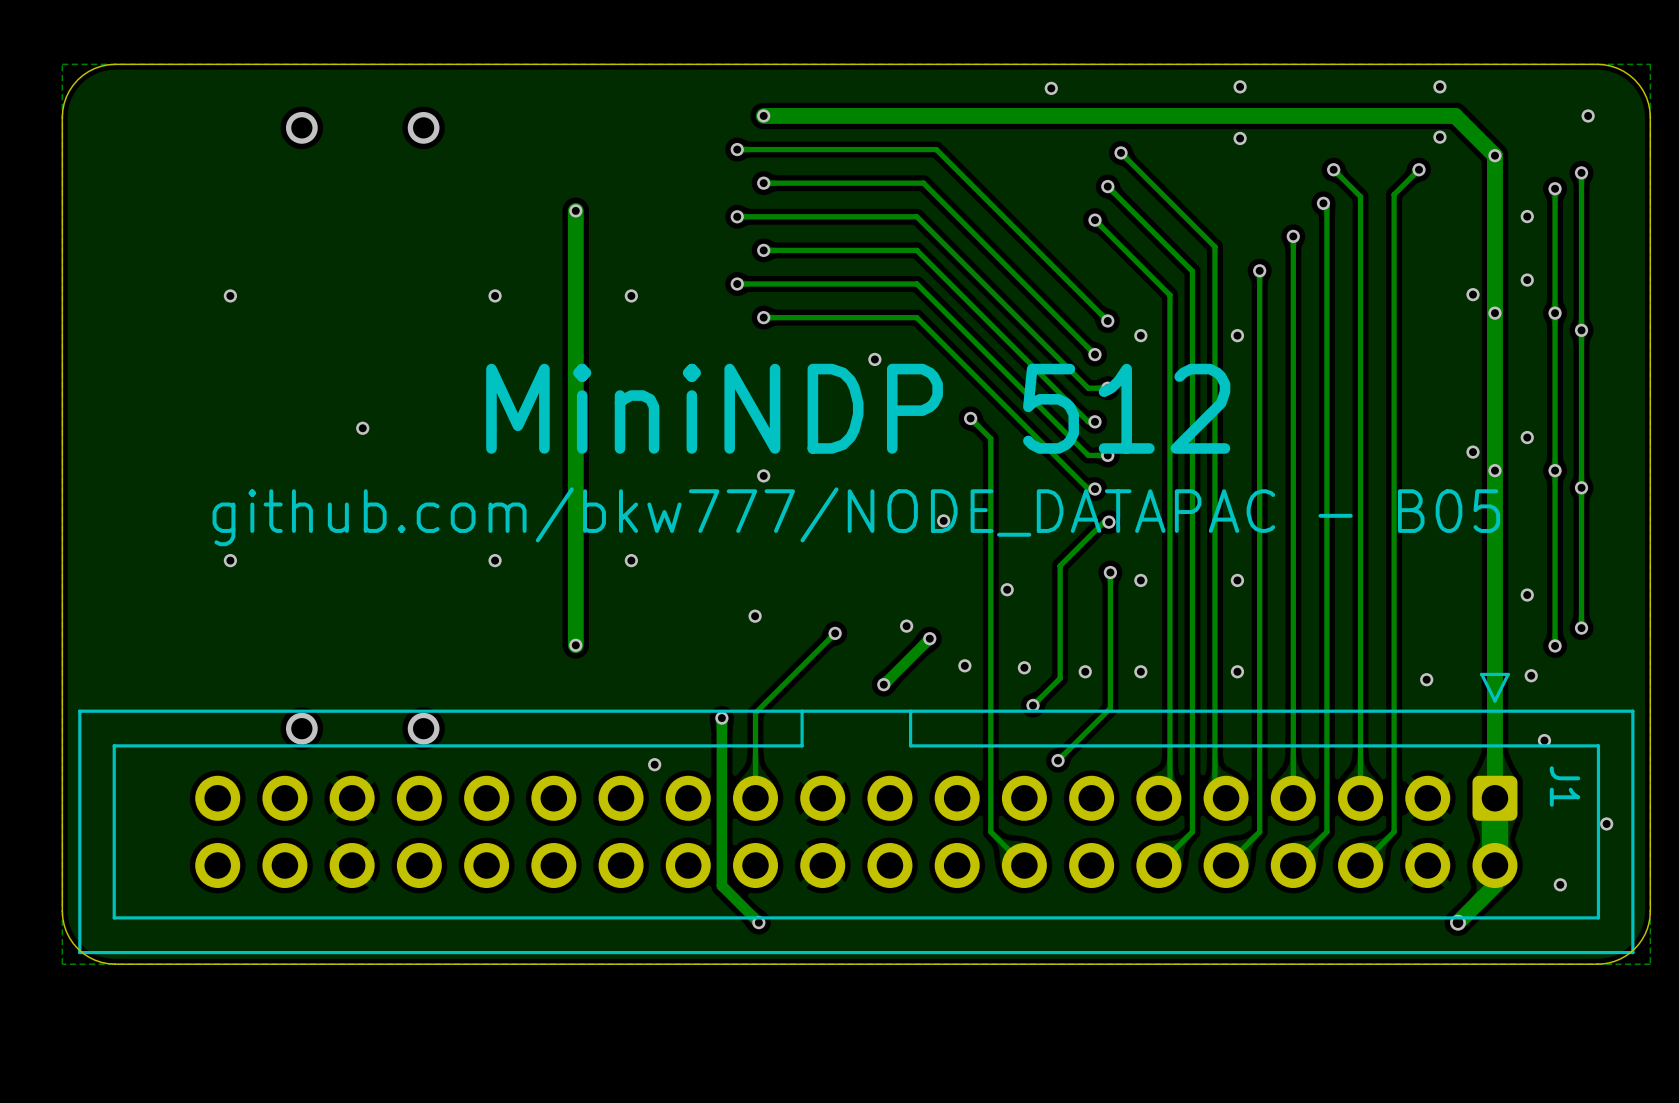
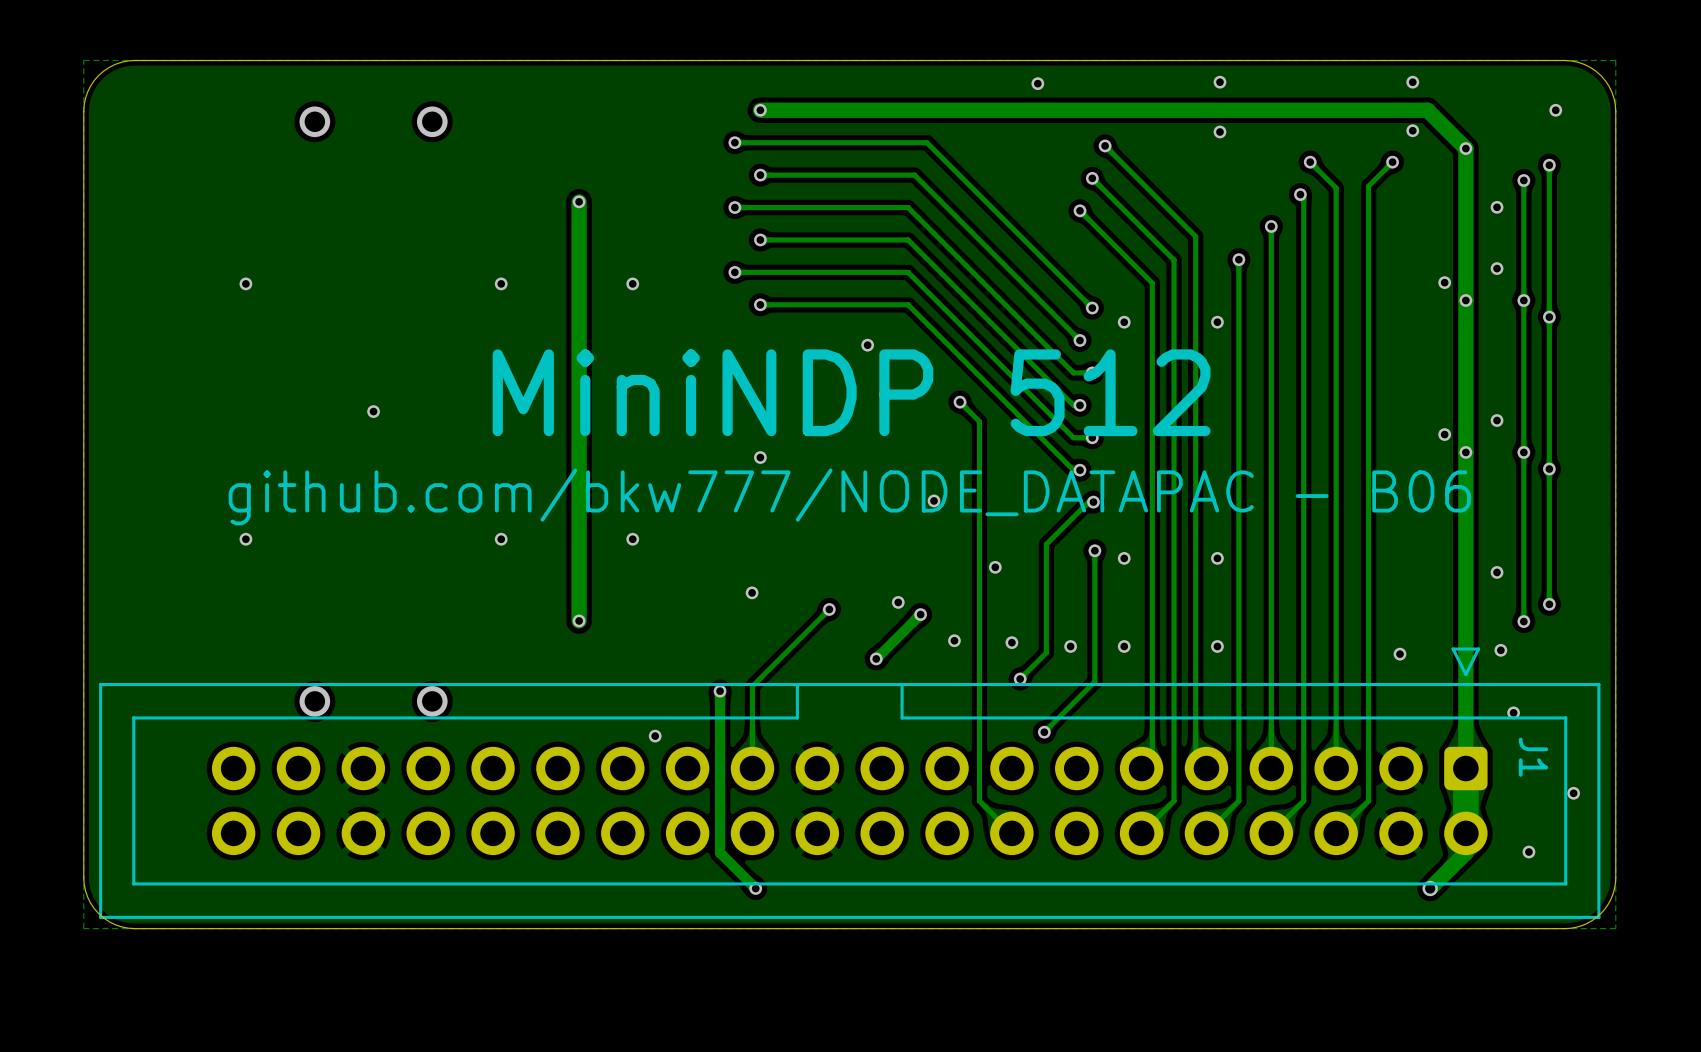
text: github.com/bkw777/NODE_DATAPAC - B05 (856, 516) -> github.com/bkw777/NODE_DATAPAC - B06 (849, 496)

